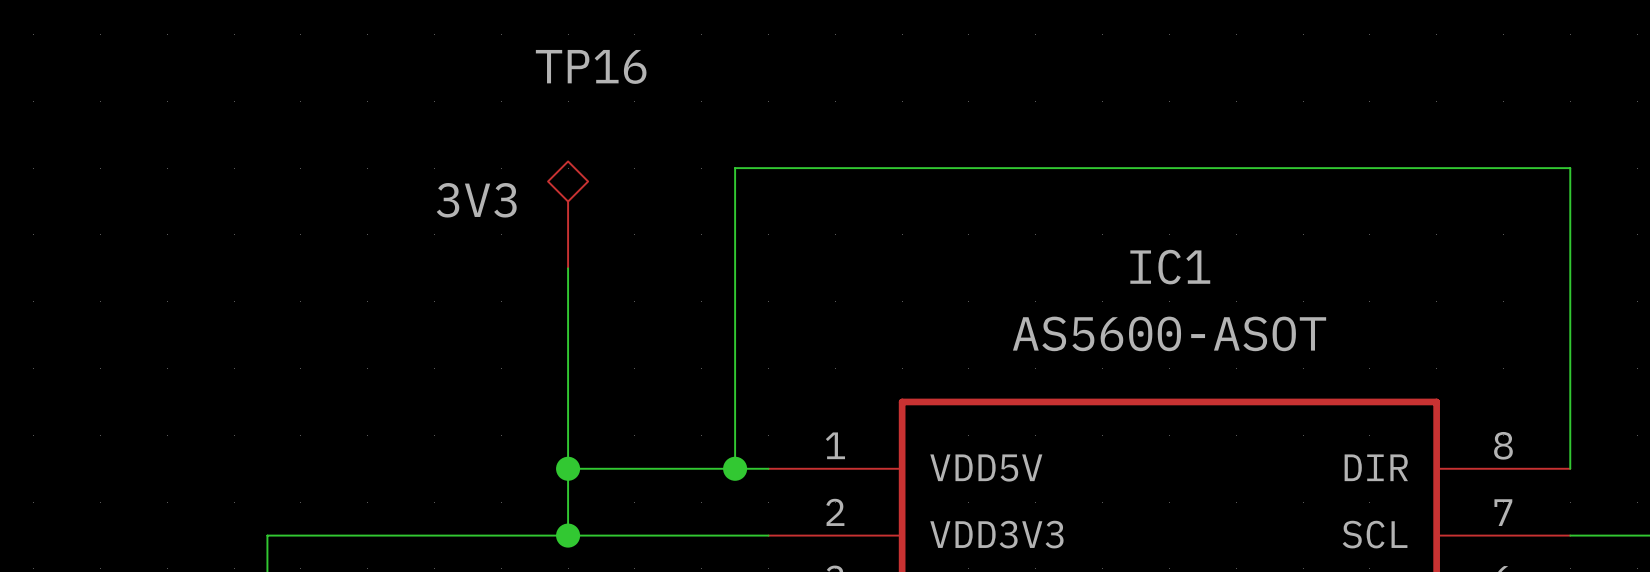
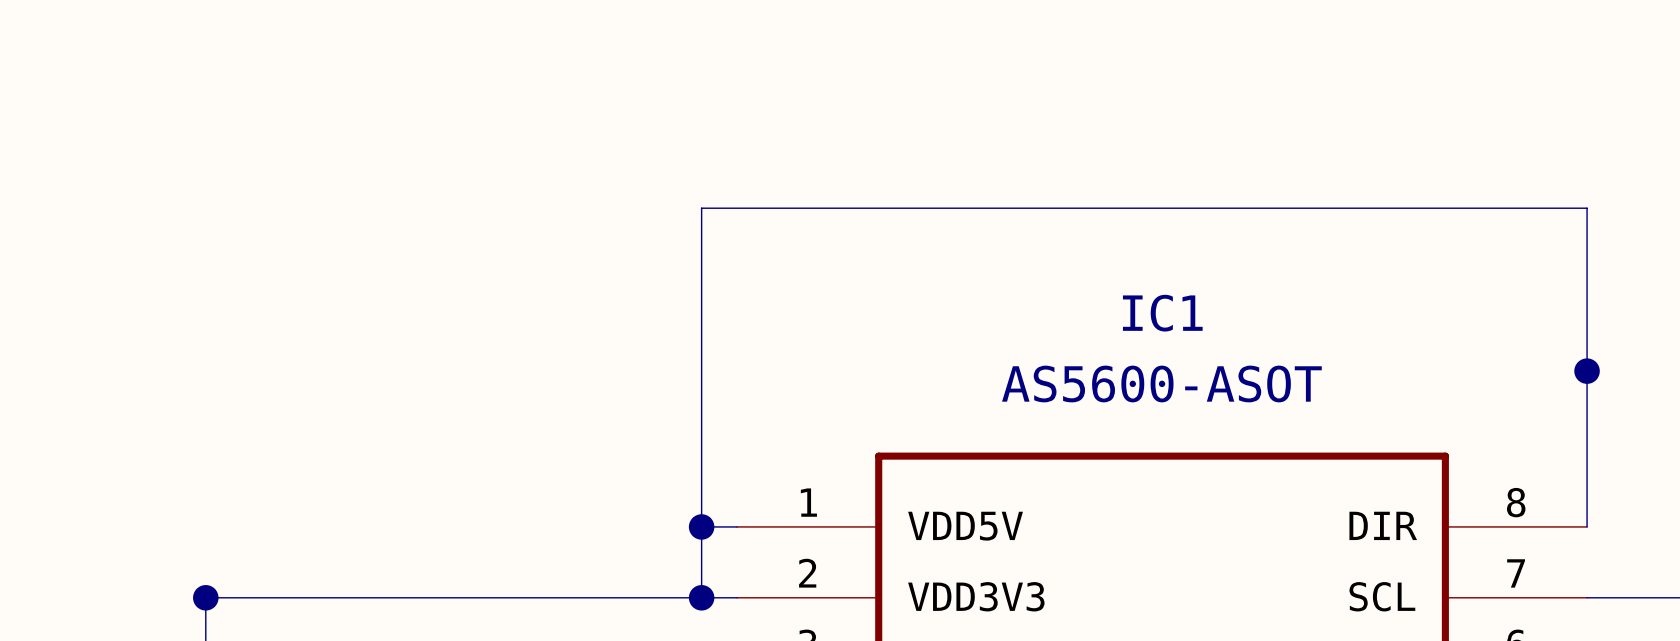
TP16: 3V3 (568, 214) -> none
wire: (568, 268) (568, 535) -> none
junction: none -> (1587, 371)
wire: (568, 468) (735, 468) -> (701, 597) (701, 526)
junction: (568, 468) -> none
junction: none -> (205, 597)
junction: (568, 535) -> none
junction: none -> (701, 597)

